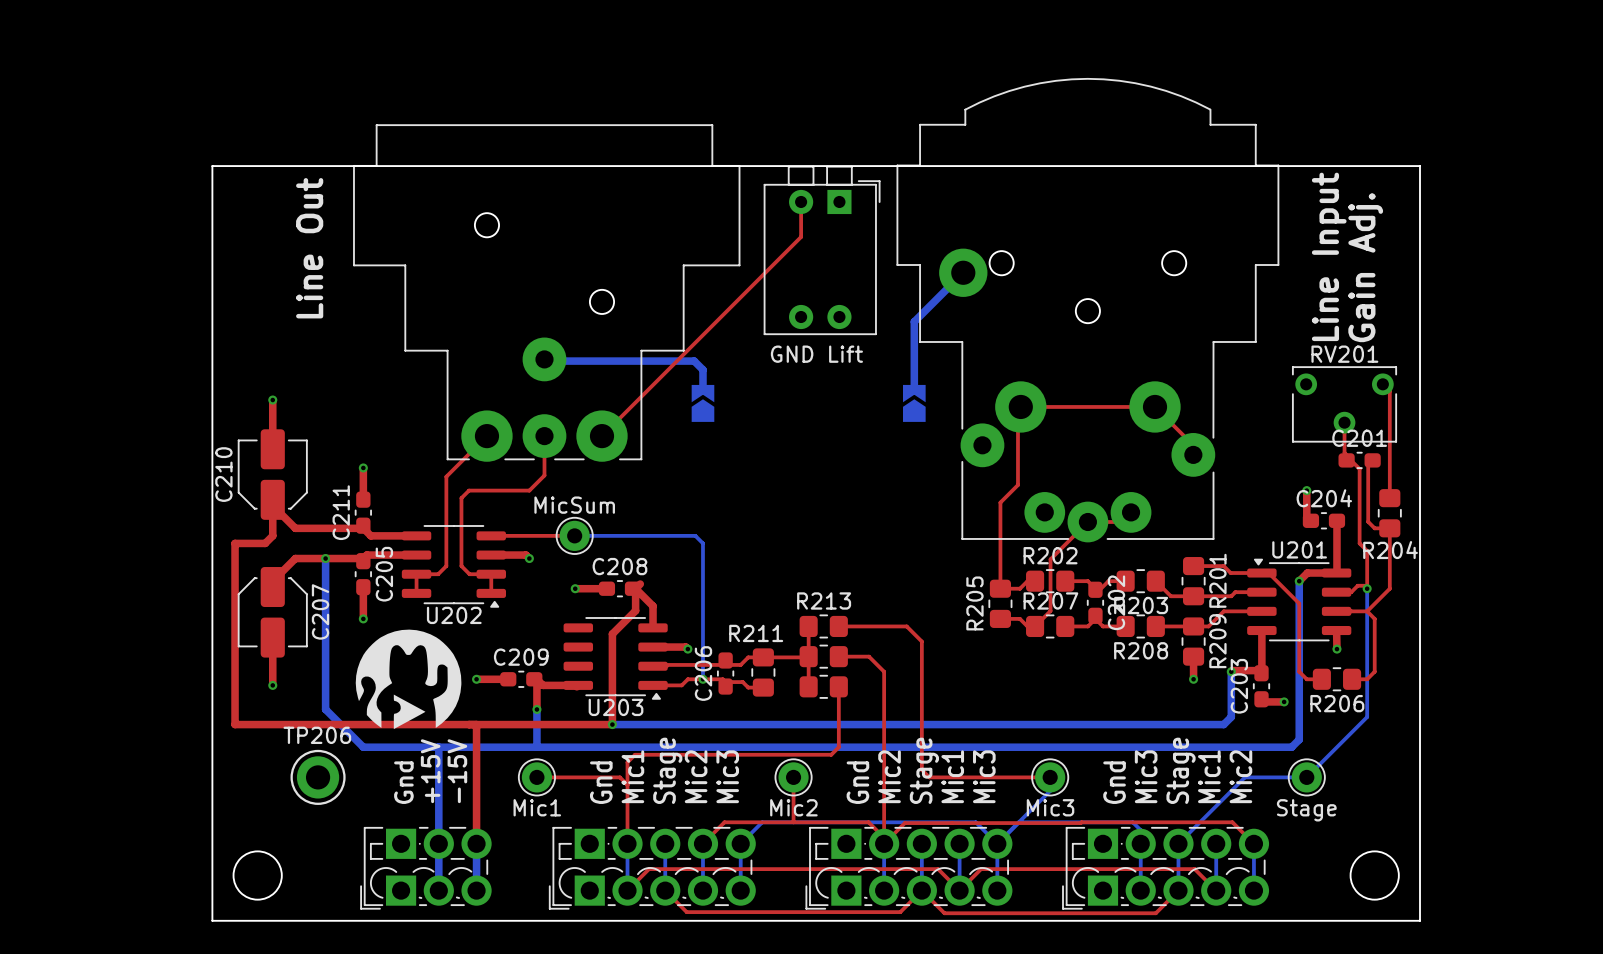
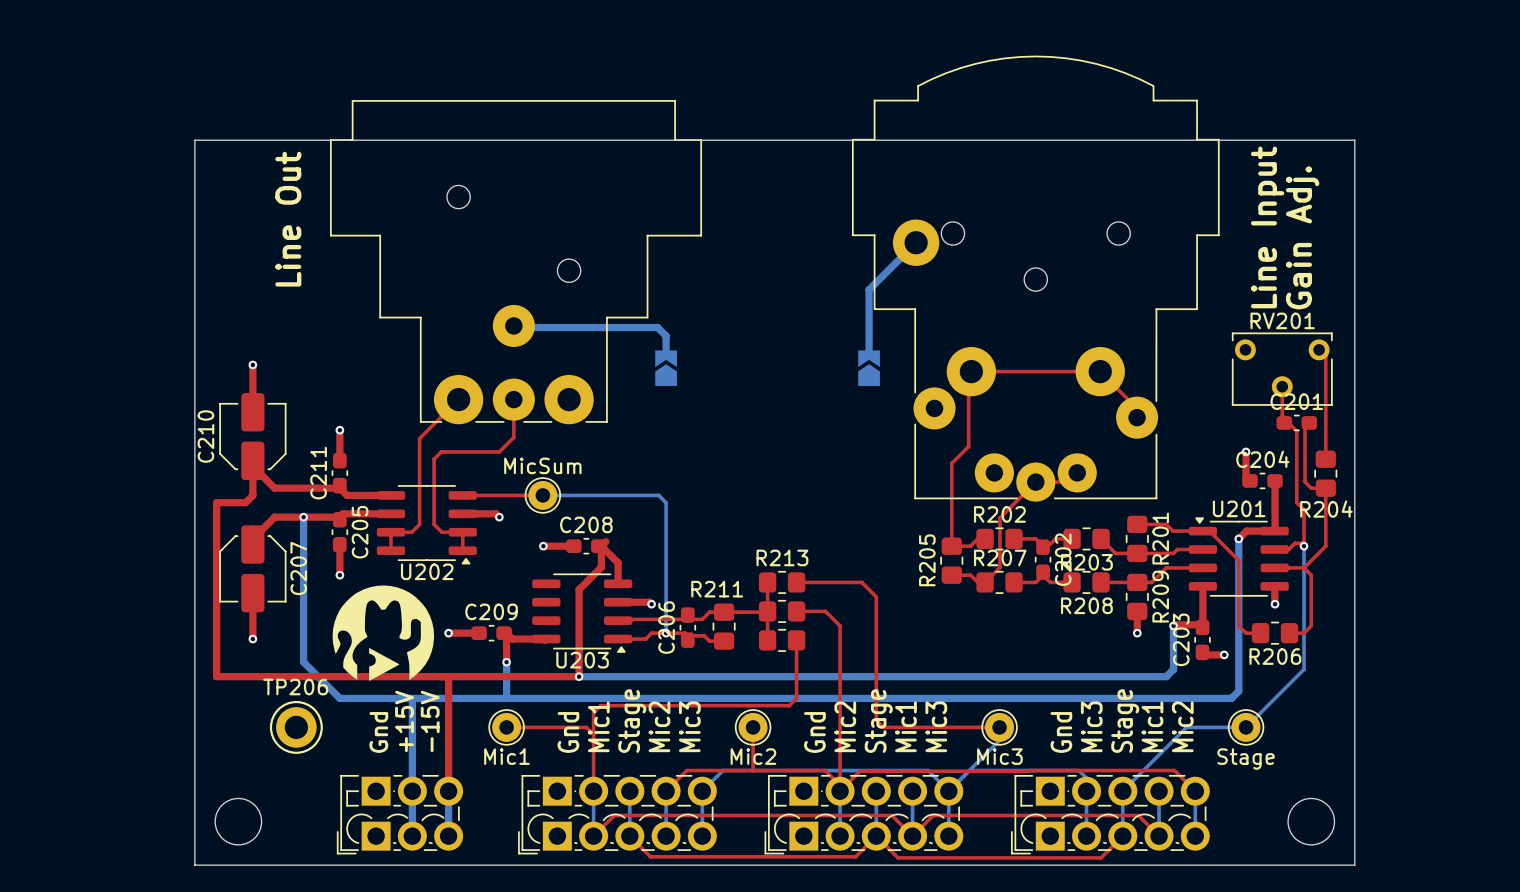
top track: (801, 201) (801, 237) (602, 436) -> none
part: GND Lift (822, 250) -> none

